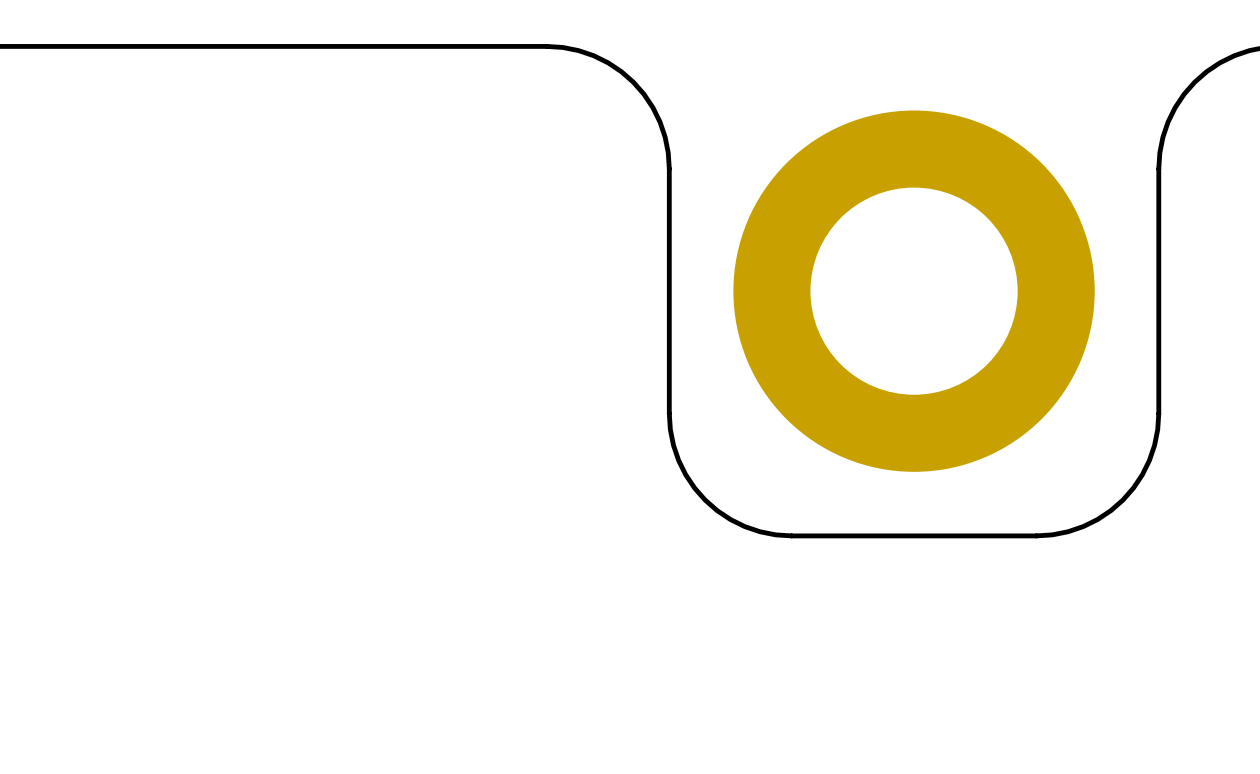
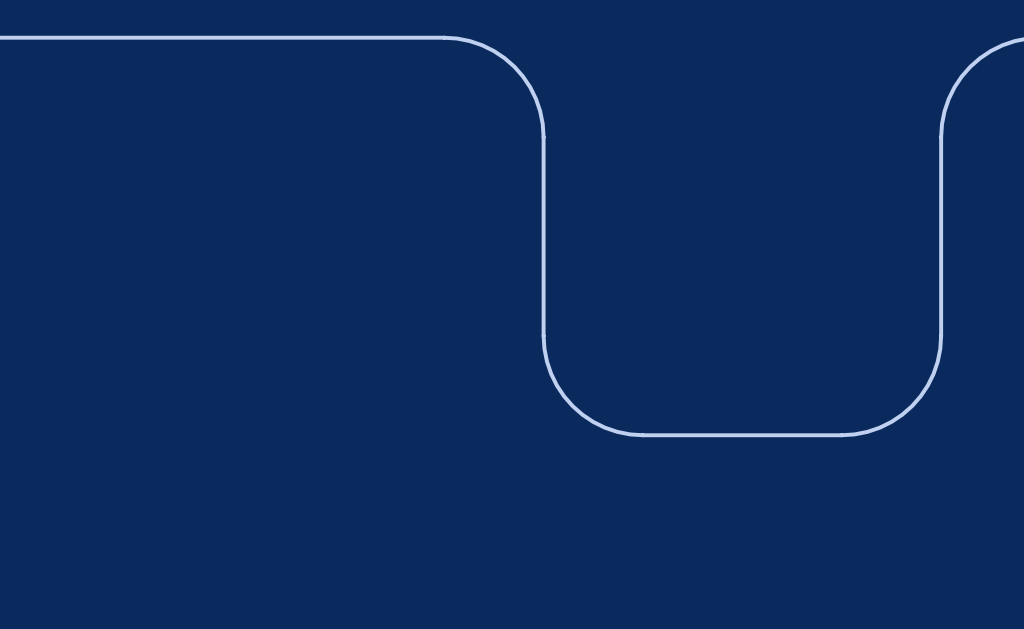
part: (914, 291) -> none

